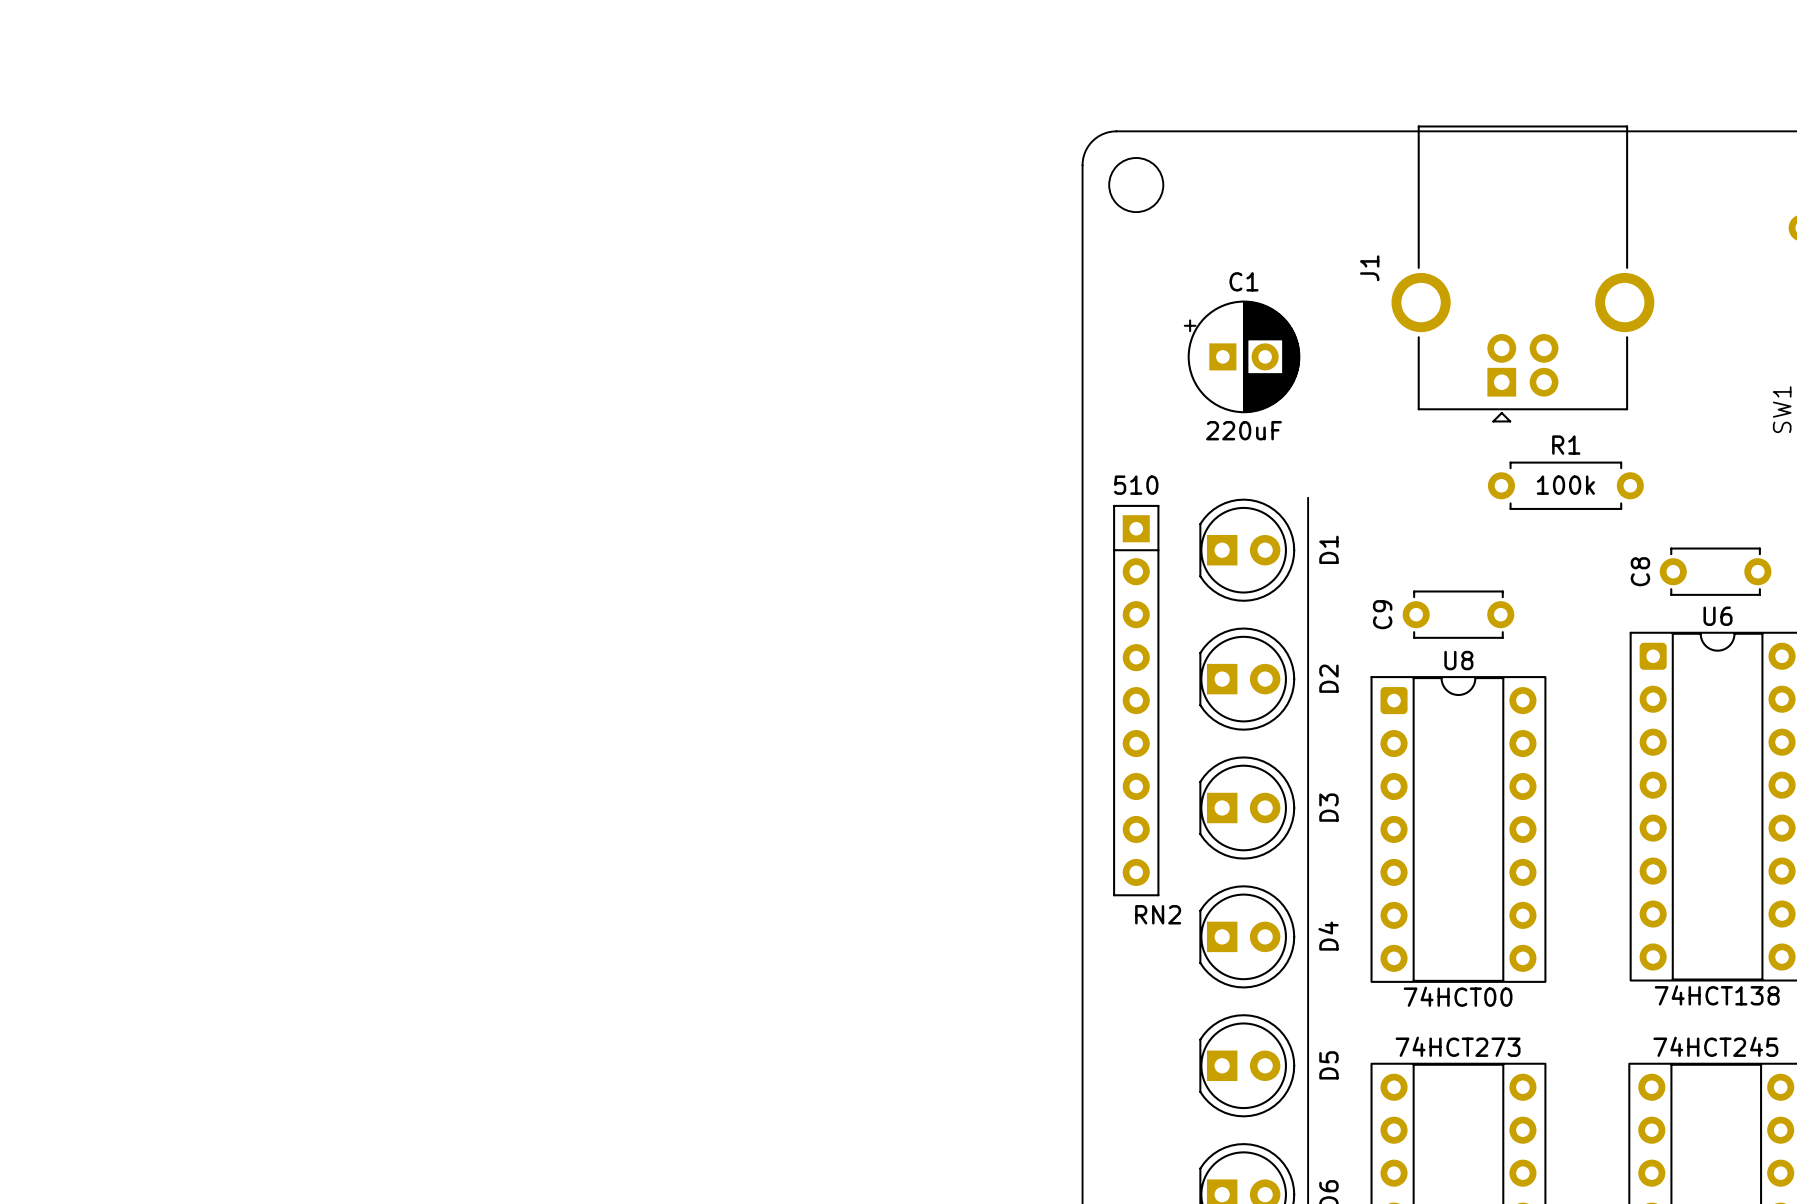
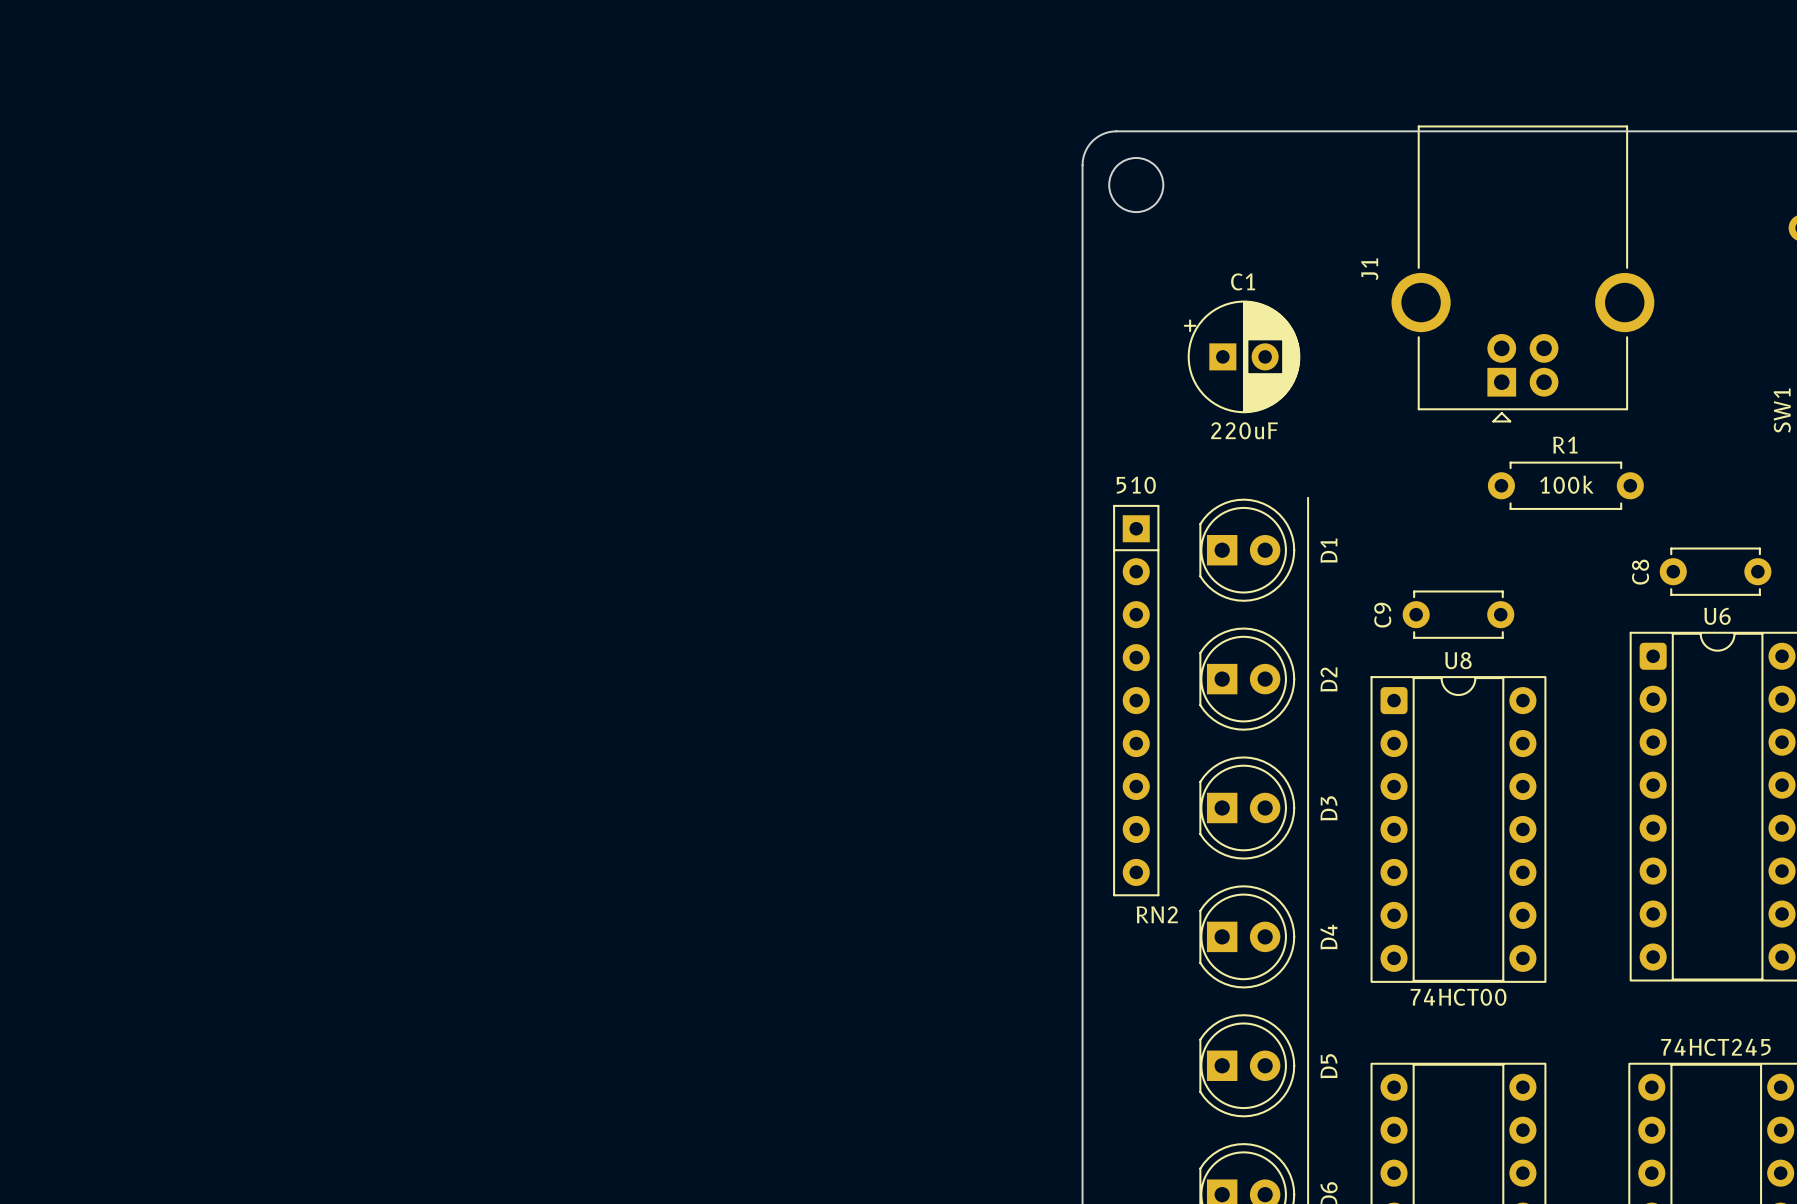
U6 value: 74HCT138 (1717, 995) -> none
part value: 74HCT273 (1458, 1046) -> none

